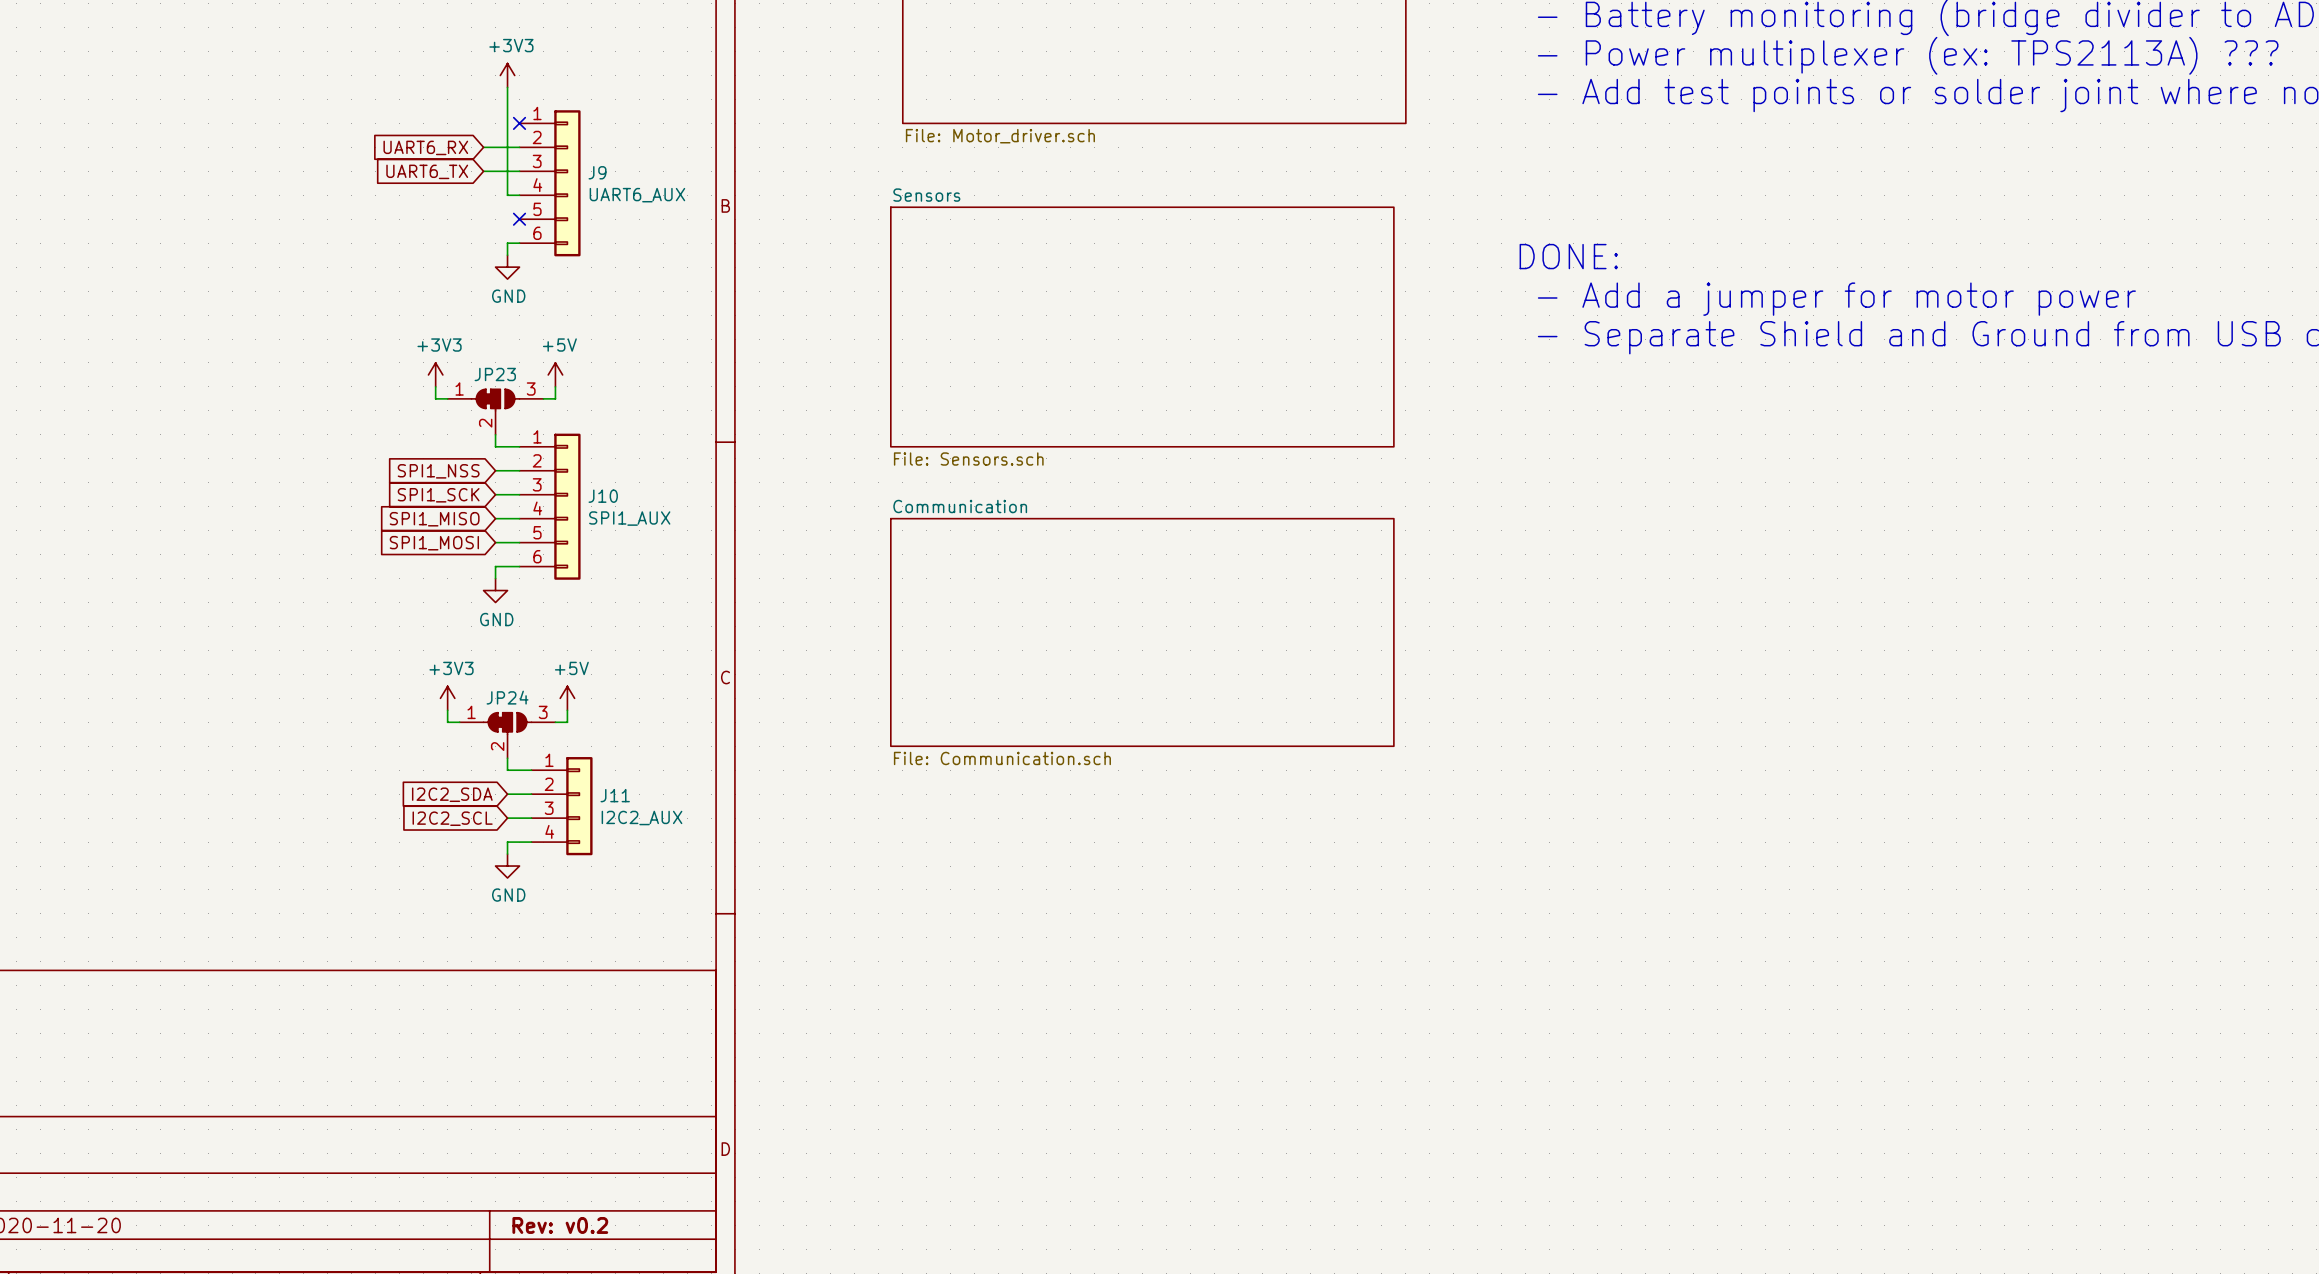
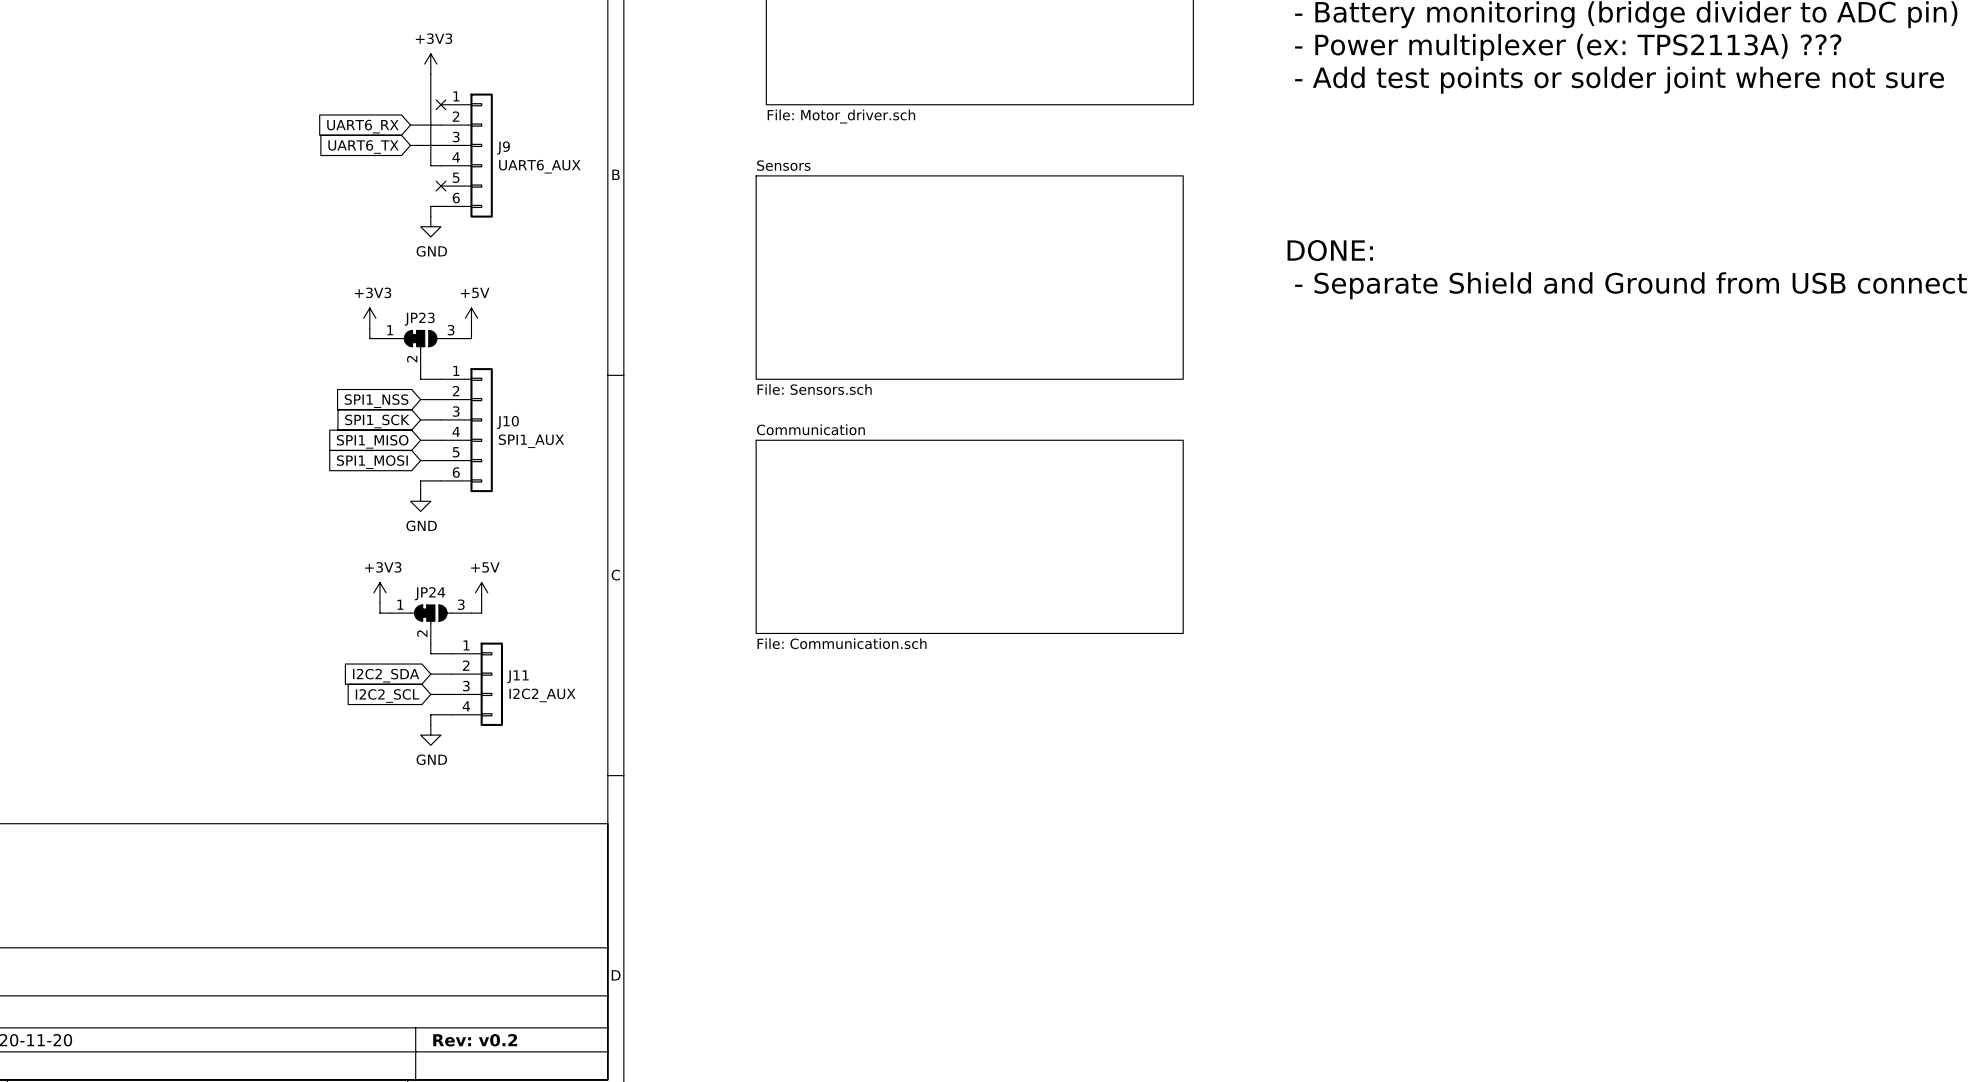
text: DONE: (1568, 256) -> none
text: - Add a jumper for motor power (1836, 299) -> DONE: (1330, 250)

